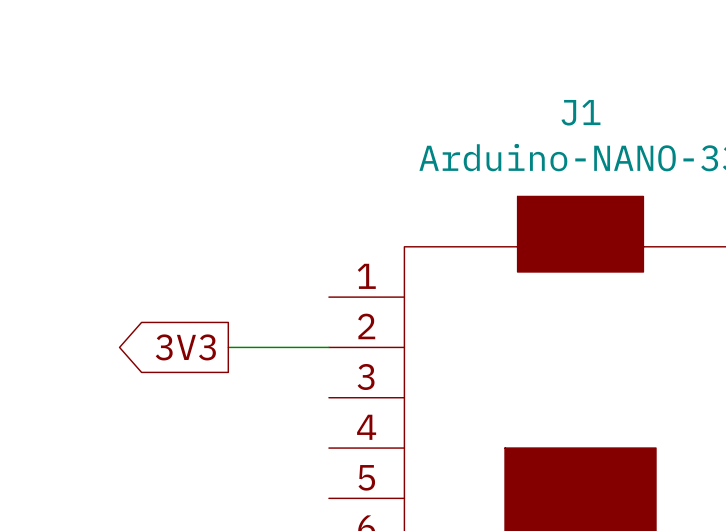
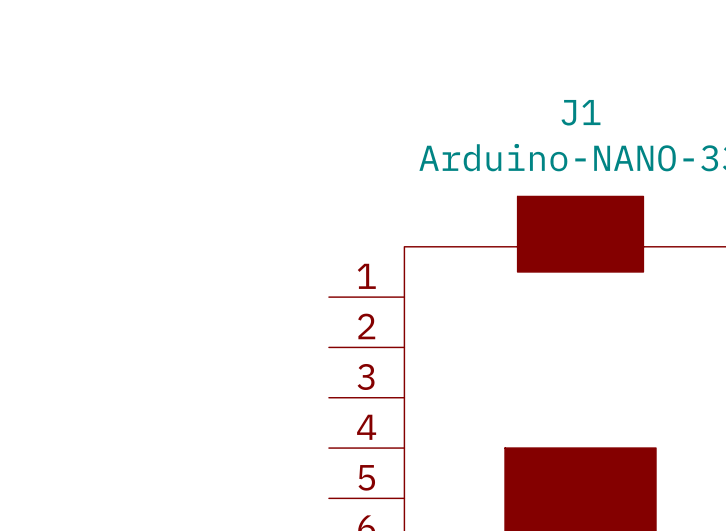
global label: 3V3 (185, 347) -> none
wire: (228, 347) (328, 347) -> none

